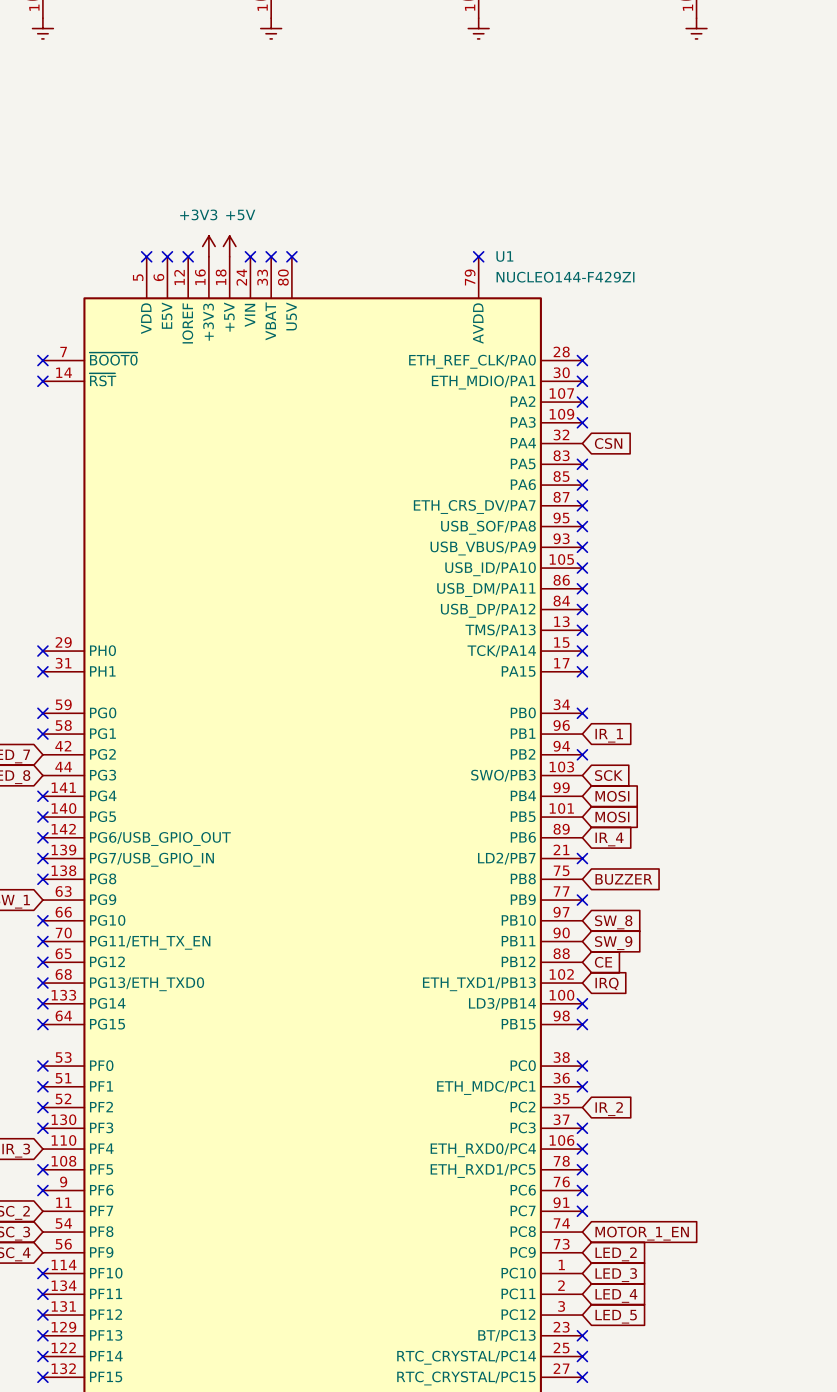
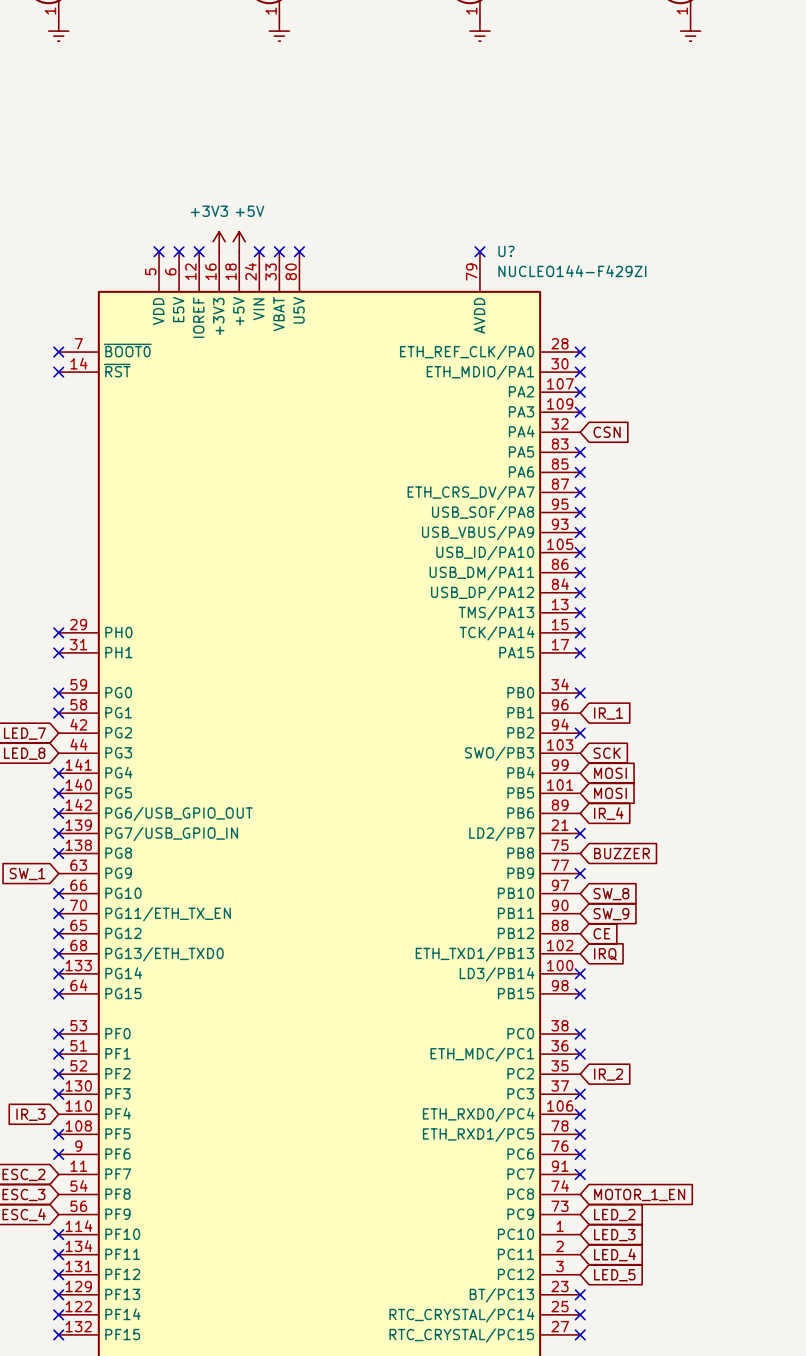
U1 name: U1 (504, 256) -> U? (506, 251)

